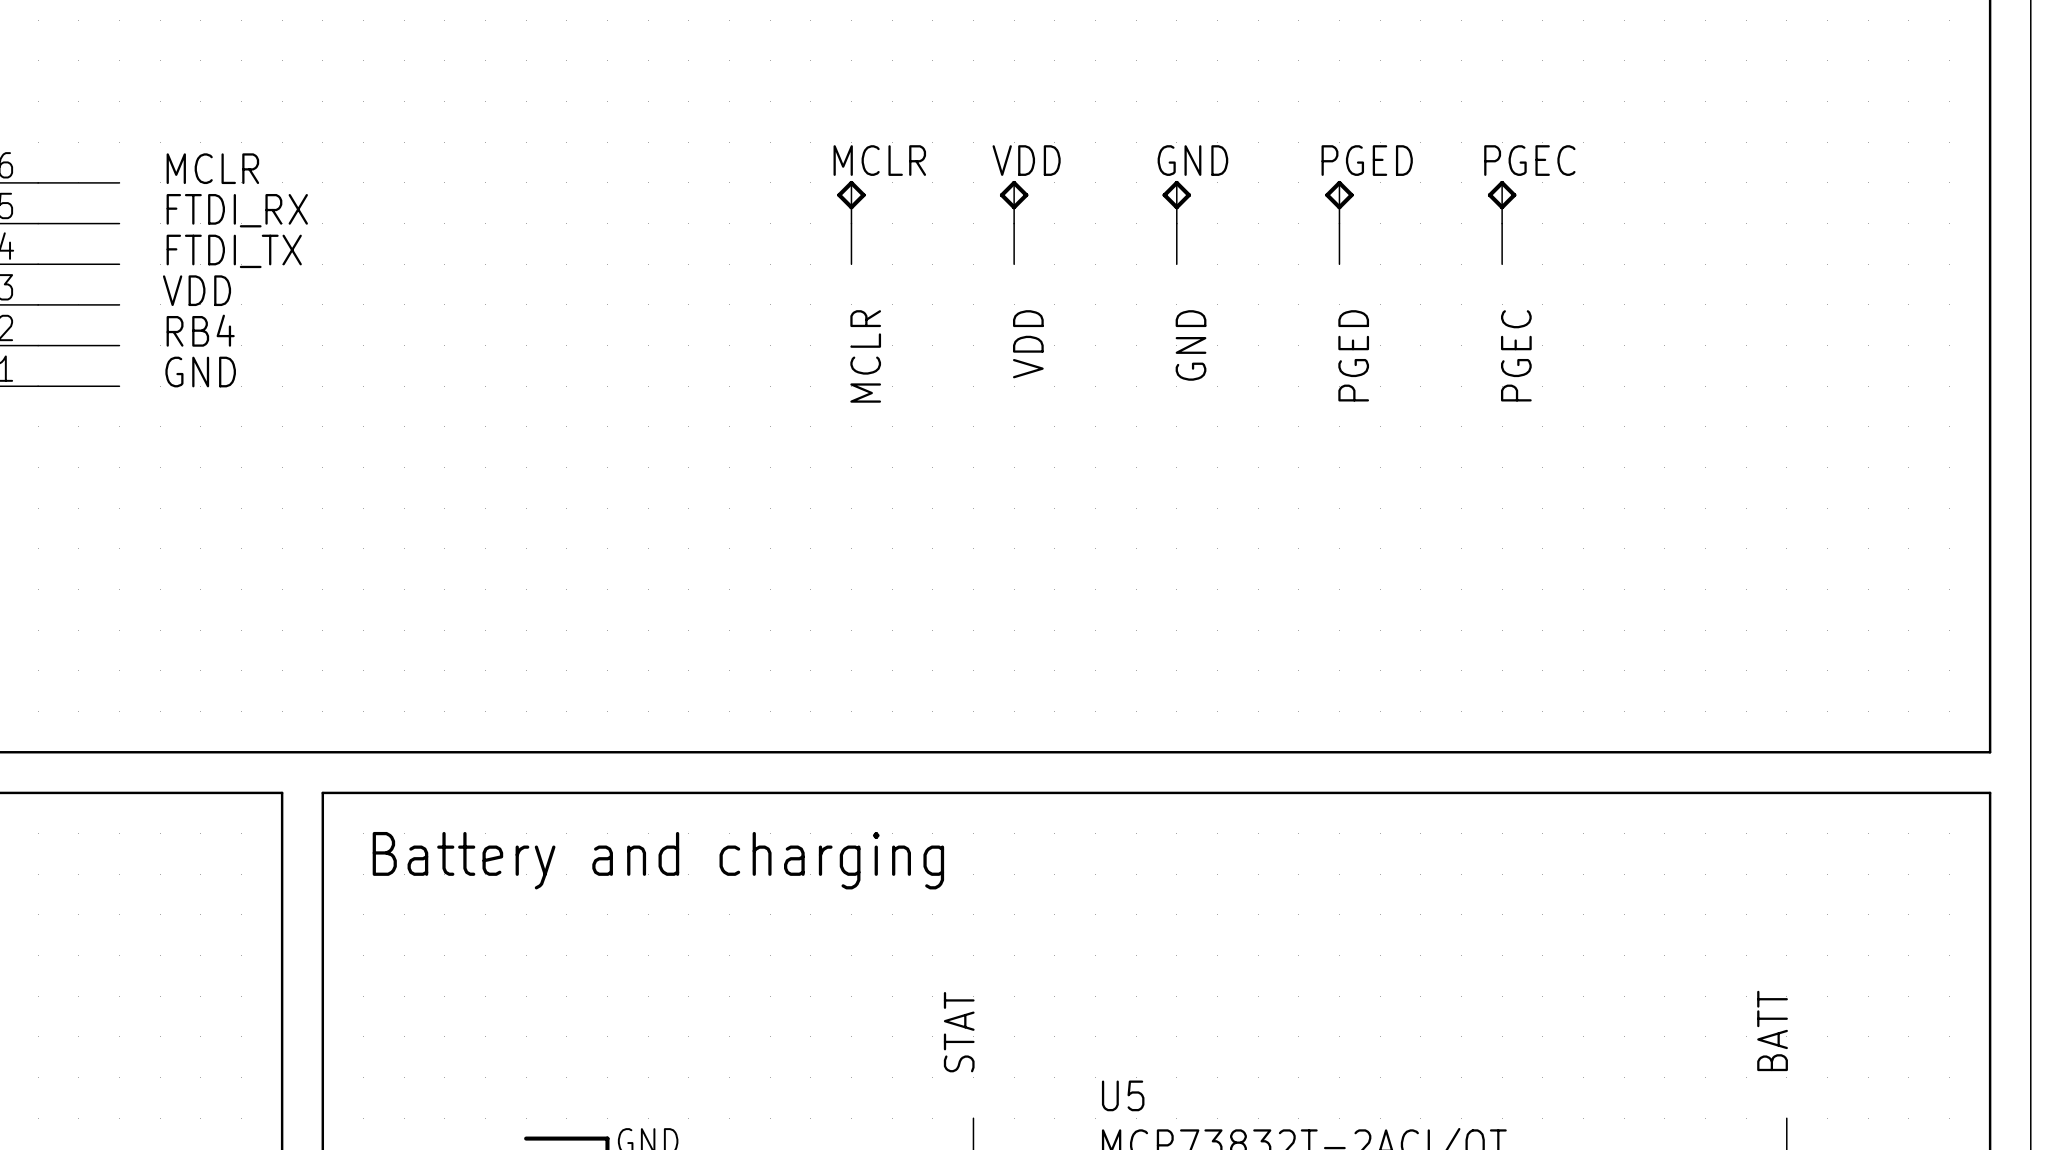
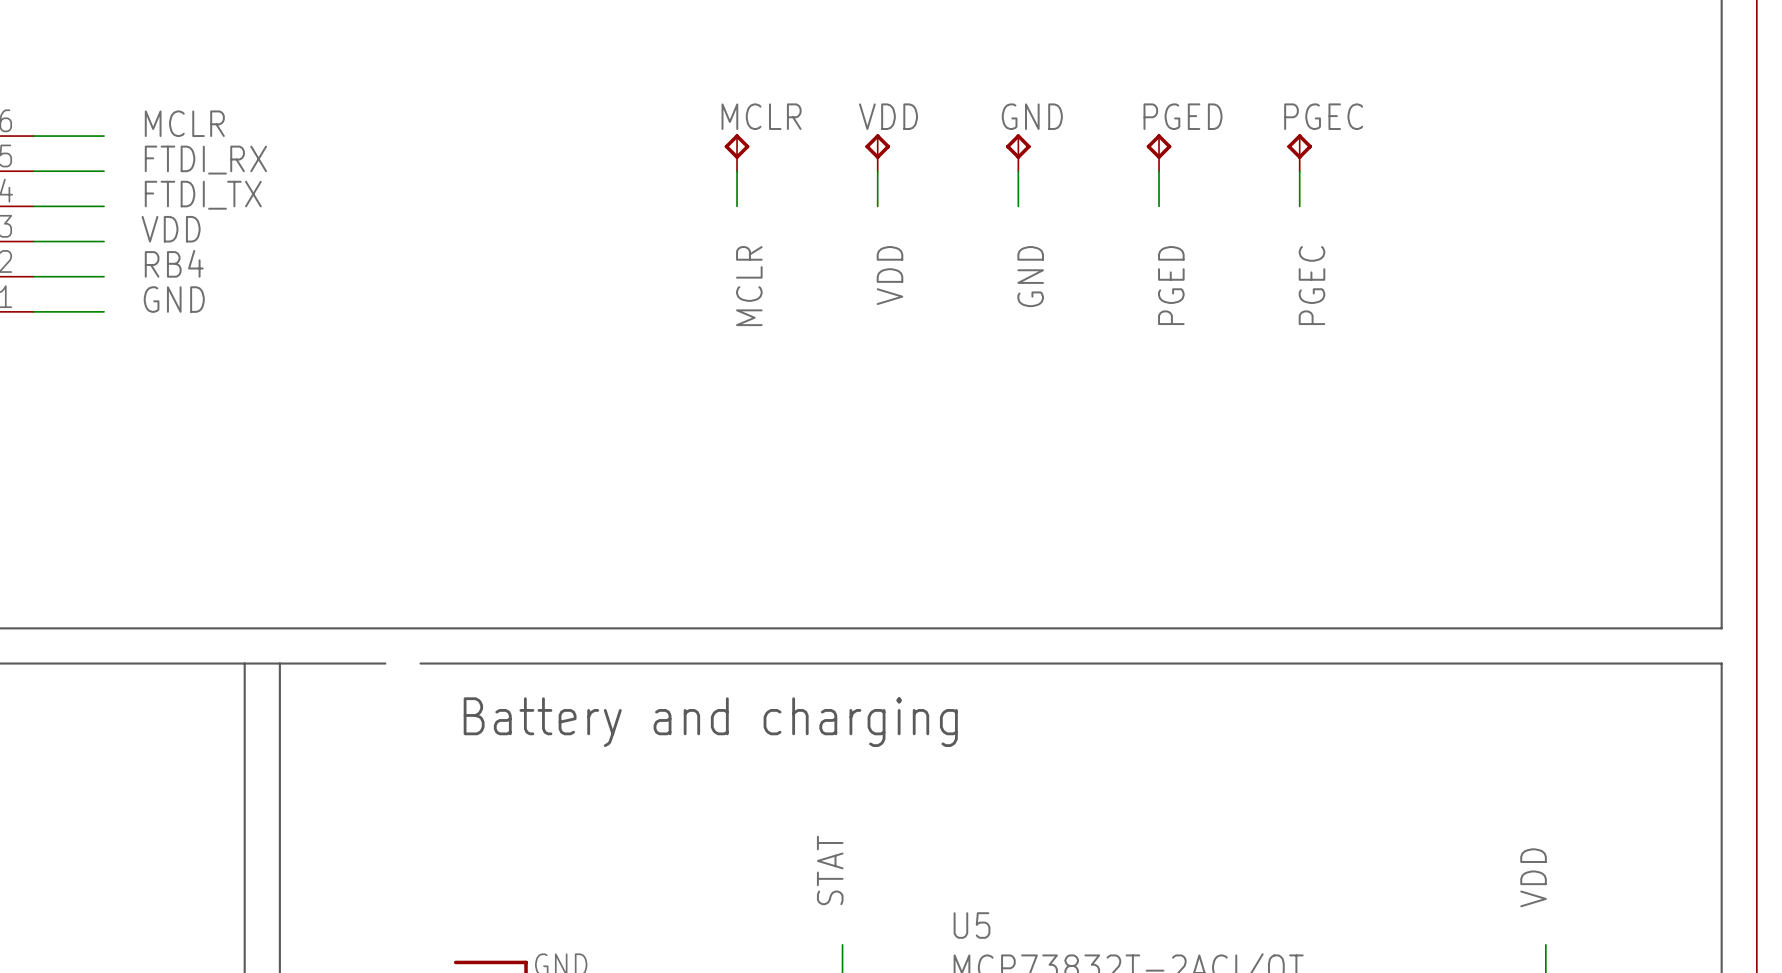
line: (444, 792) (485, 792) -> (244, 663) (279, 663)
text position: Battery and charging (658, 860) -> Battery and charging (710, 722)
label: BATT (1772, 1030) -> VDD (1533, 877)

